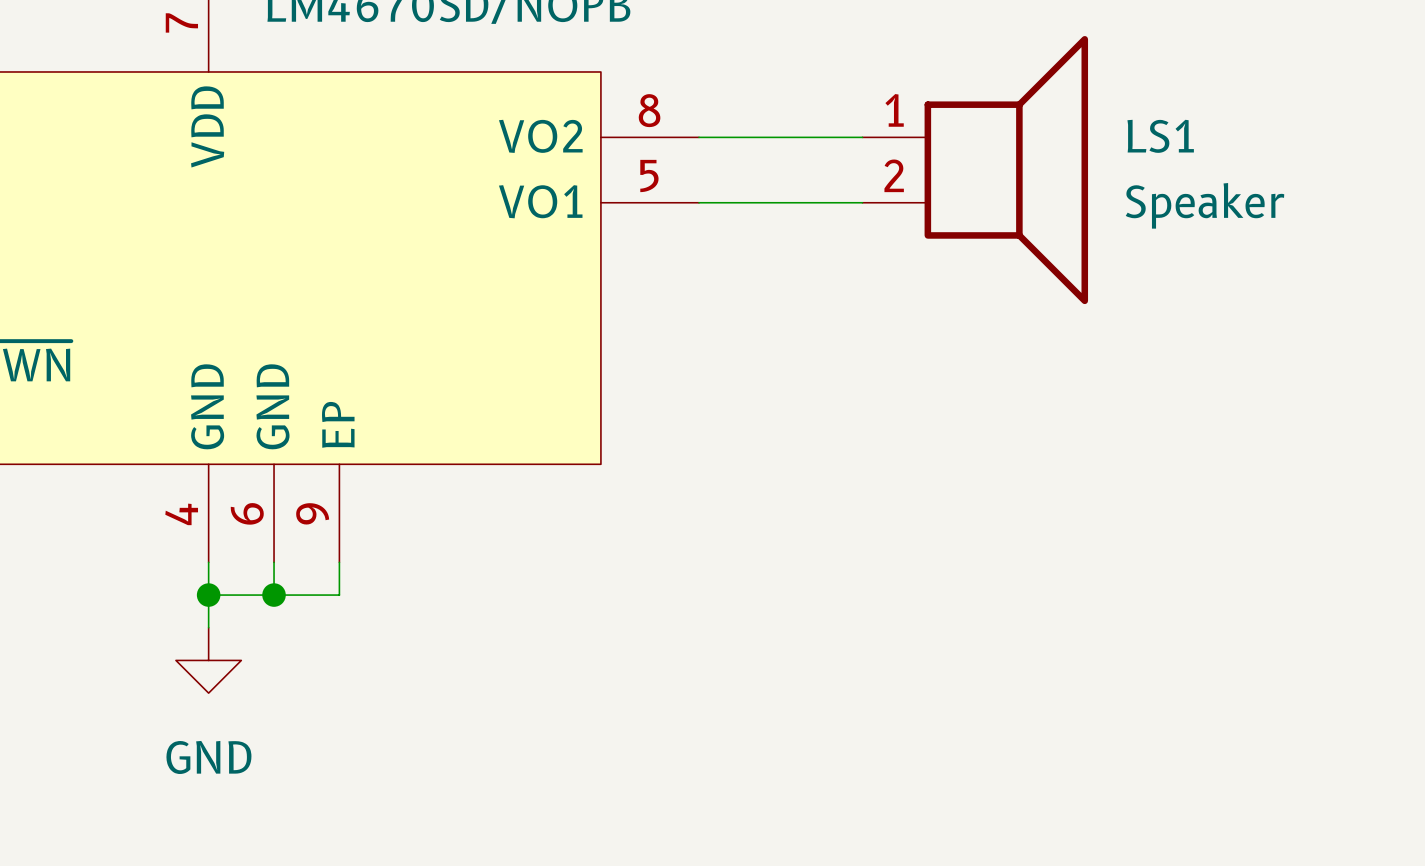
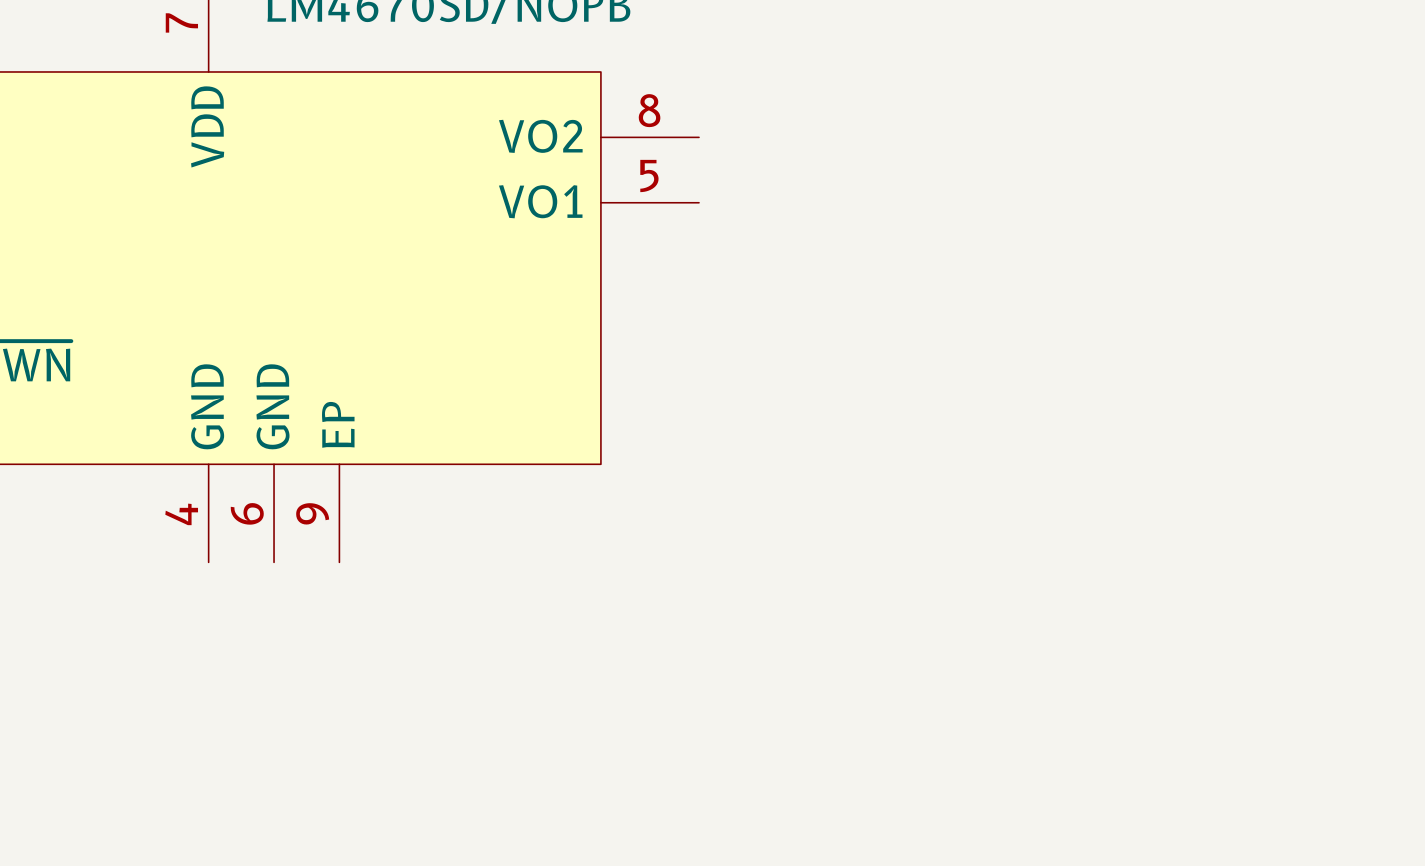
wire: (699, 137) (862, 137) -> none
LS1: Speaker (975, 170) -> none
wire: (699, 202) (862, 202) -> none
wire: (208, 562) (208, 627) -> none
wire: (274, 562) (274, 595) -> none
wire: (339, 562) (339, 595) (208, 595) -> none
junction: (208, 595) -> none
junction: (274, 595) -> none
power symbol: GND (208, 660) -> none

